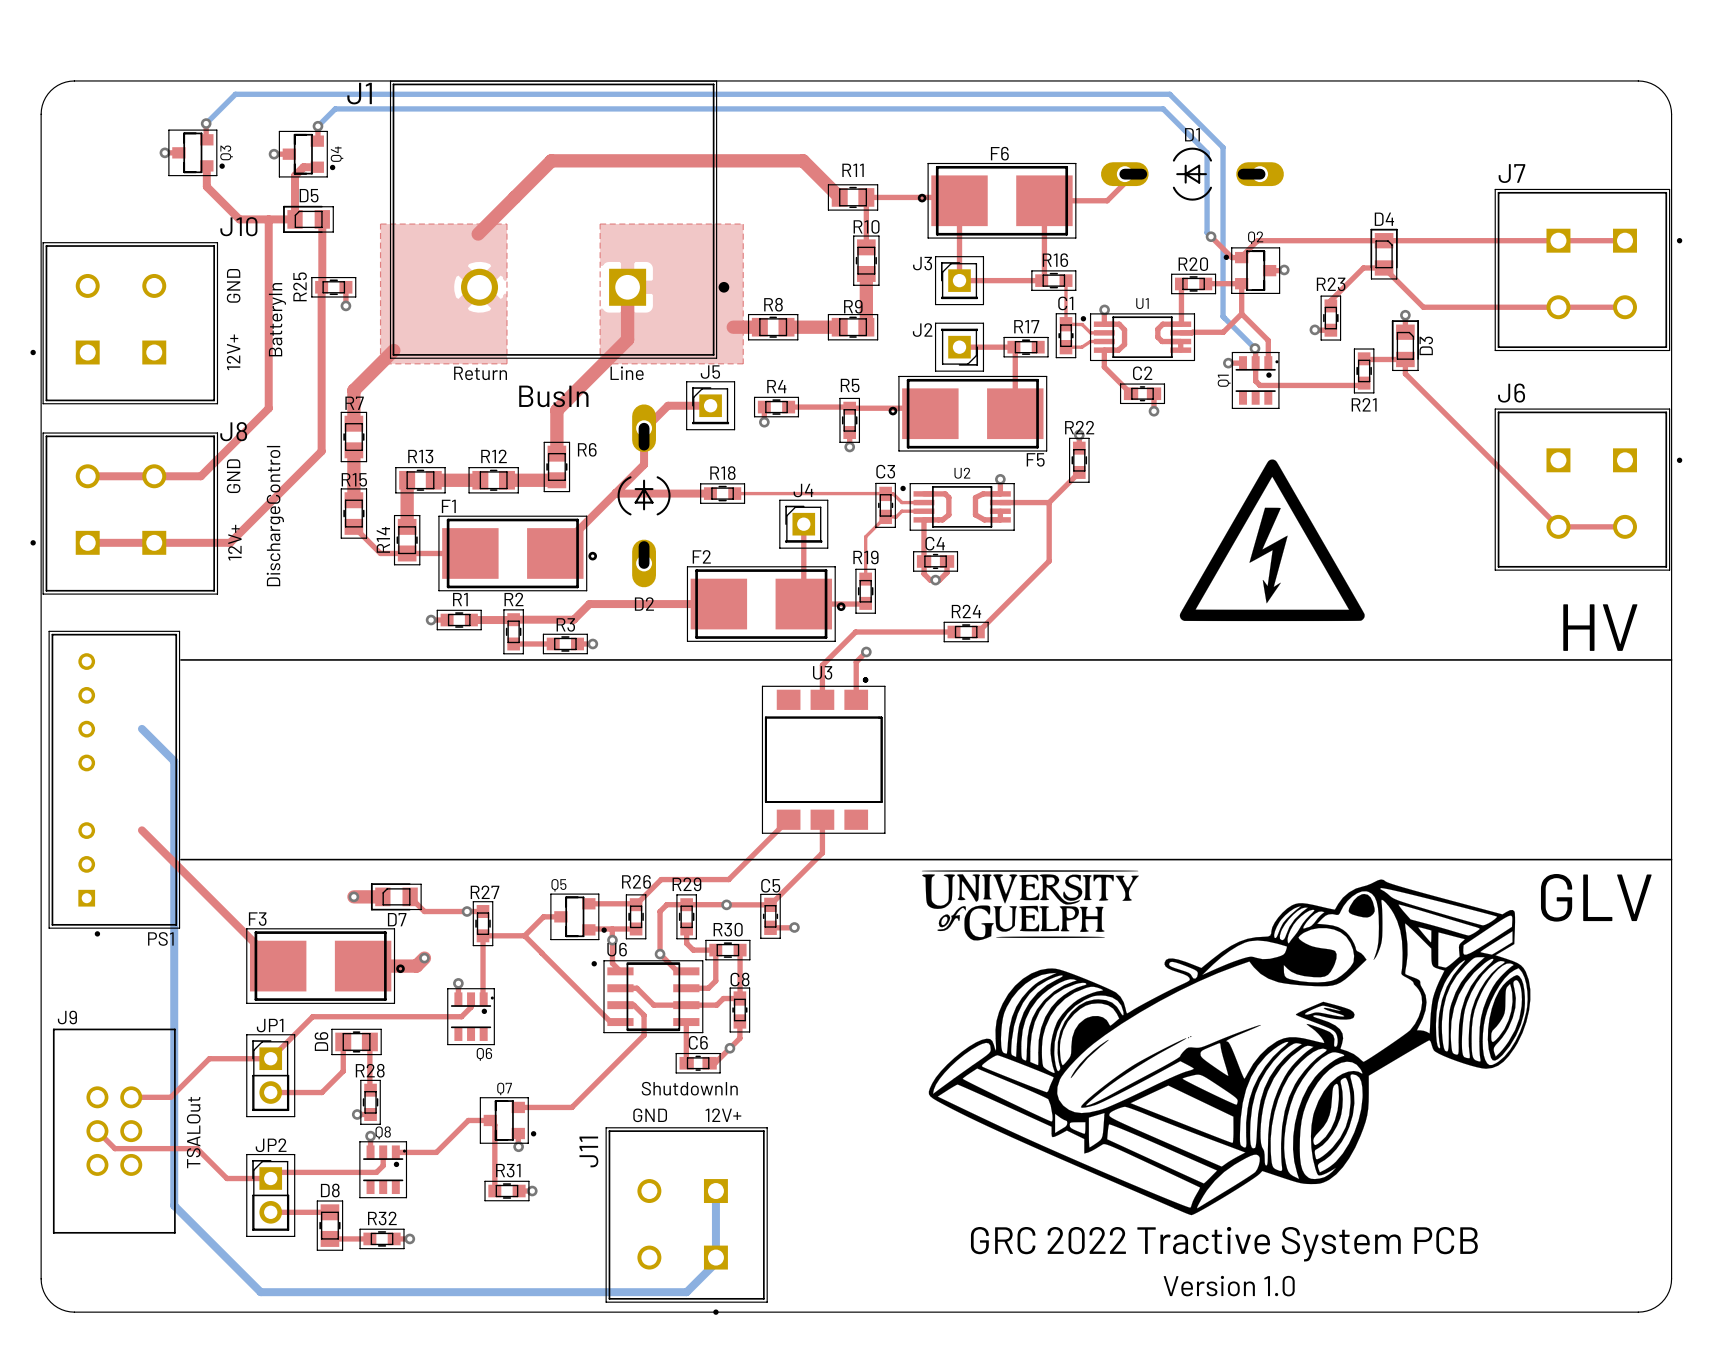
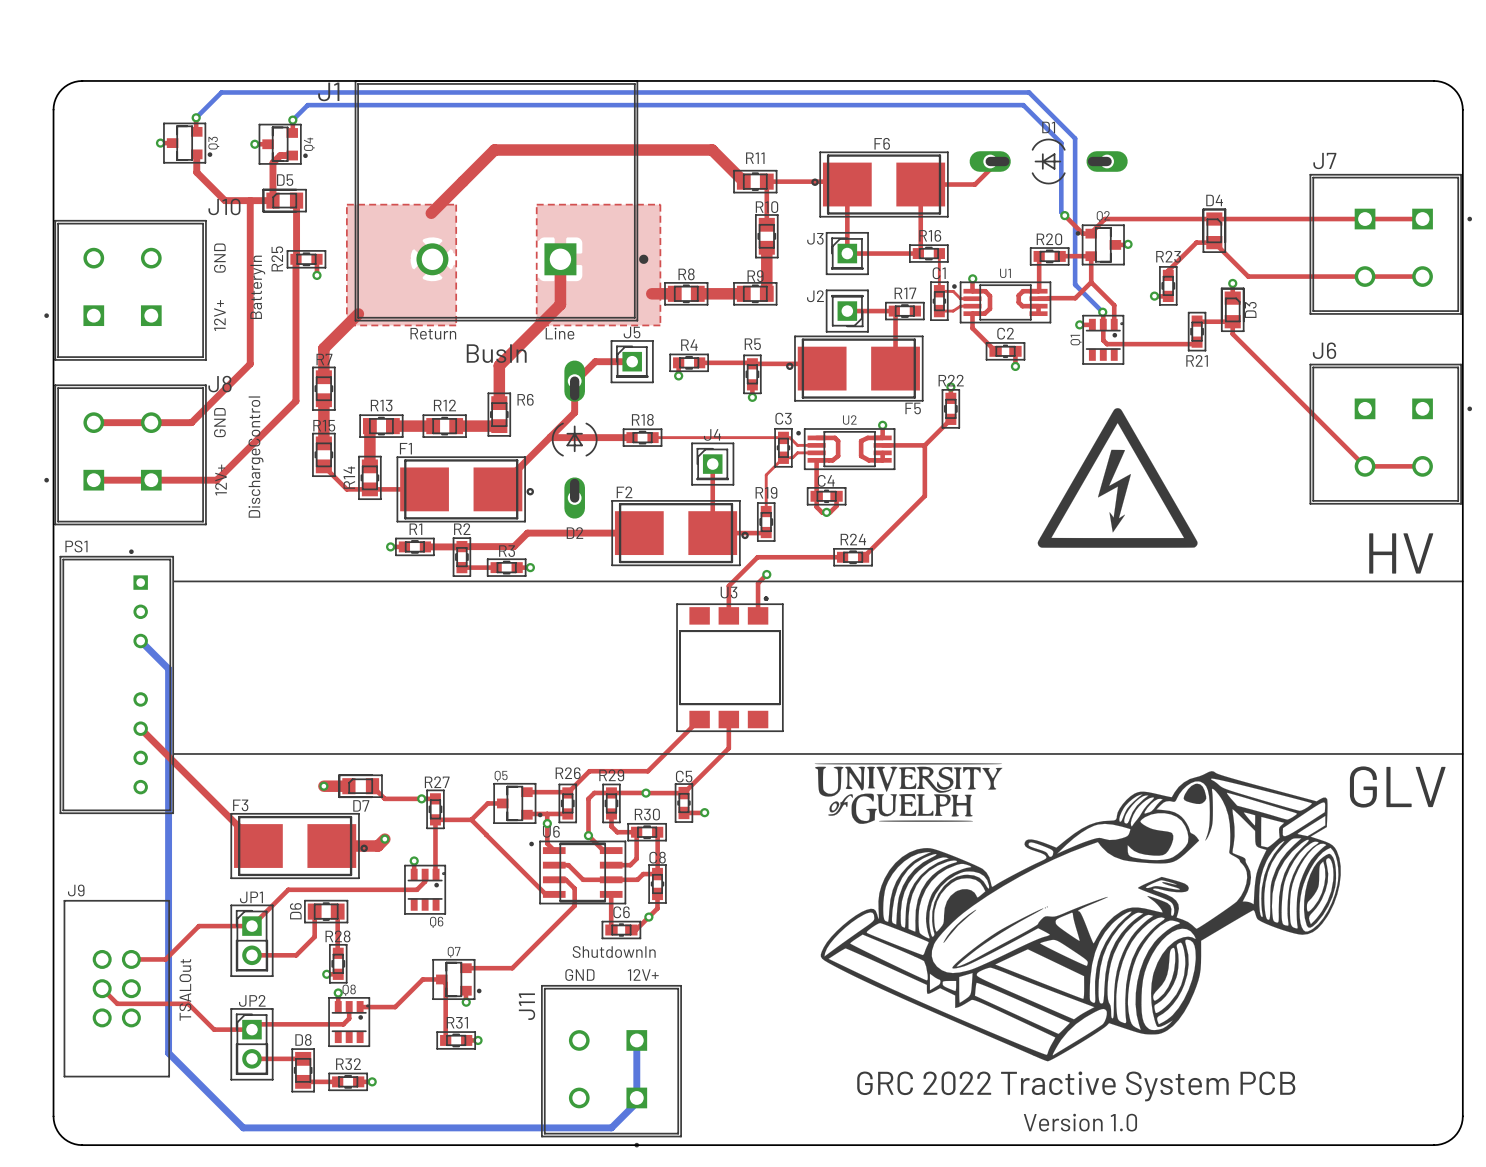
PS1 rotation: 0° (114, 783) -> 180° (116, 681)

